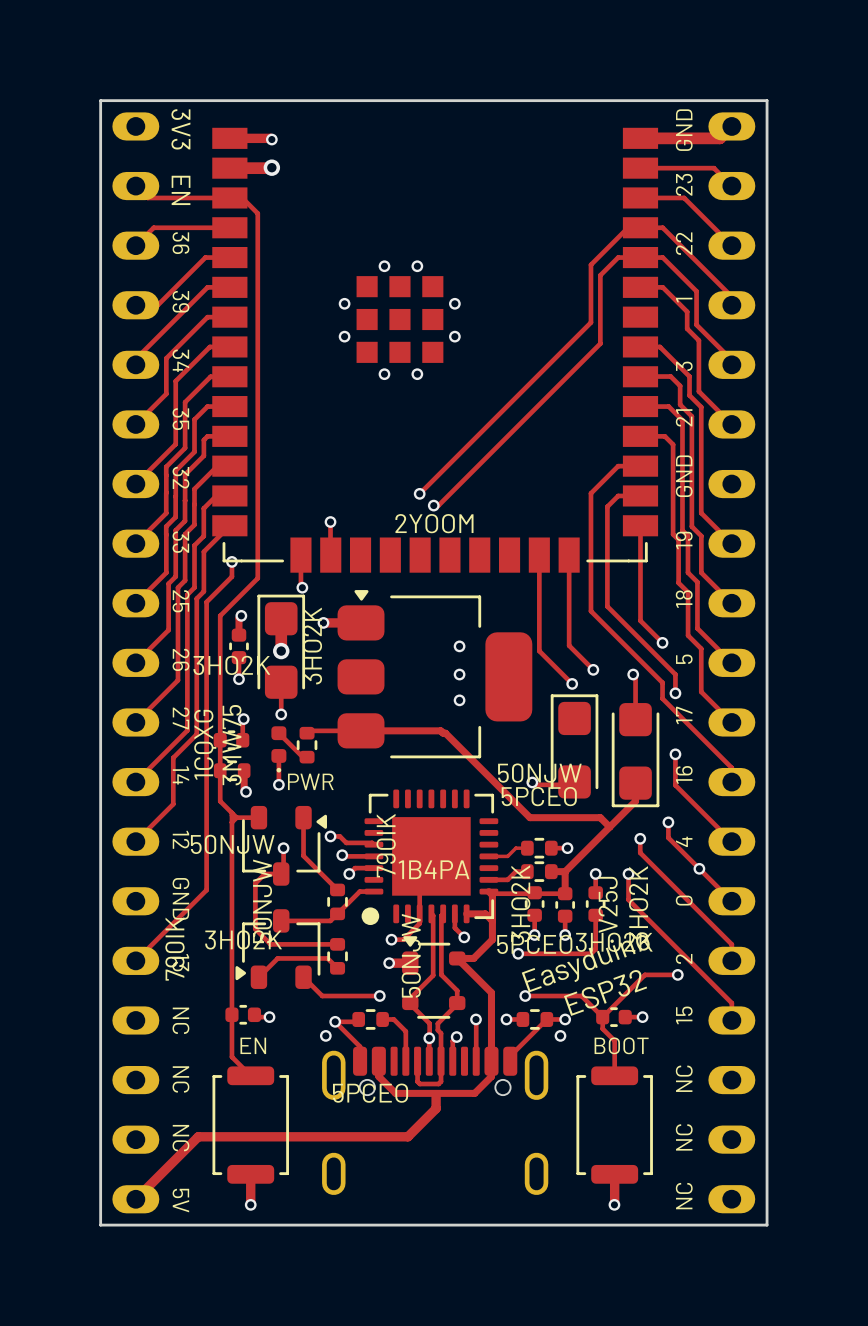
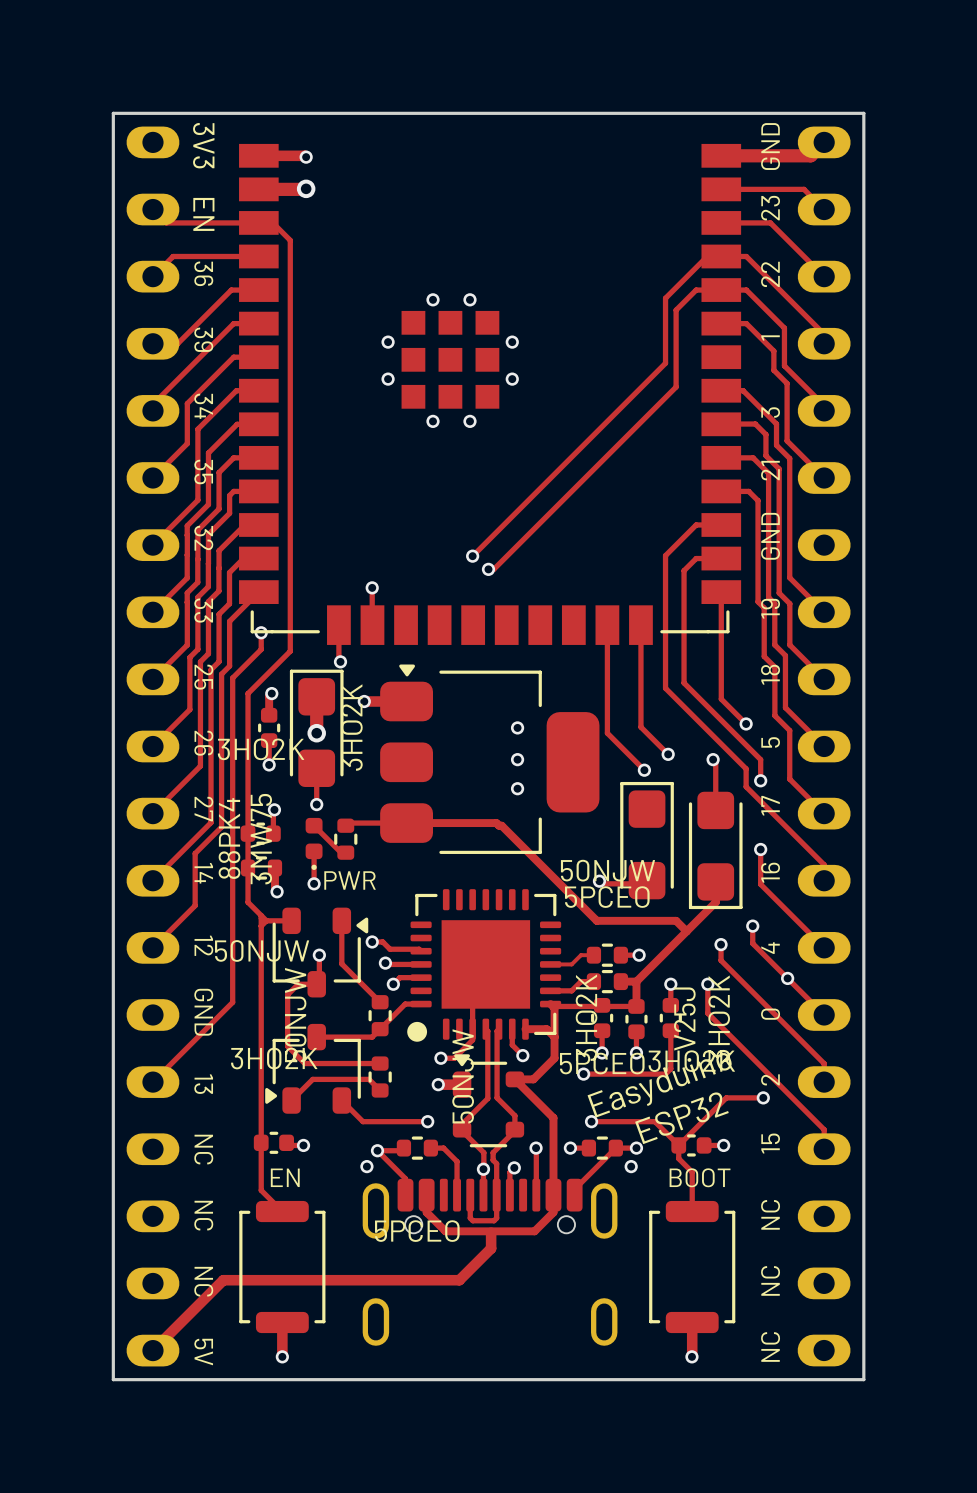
part text: 2YOOM (434, 523) -> none
part text: 1CQXG (205, 744) -> 88PK4 (229, 838)
part text: 790IK (386, 845) -> none
part text: 1B4PA (434, 869) -> none
part text: 790IK (174, 948) -> none

